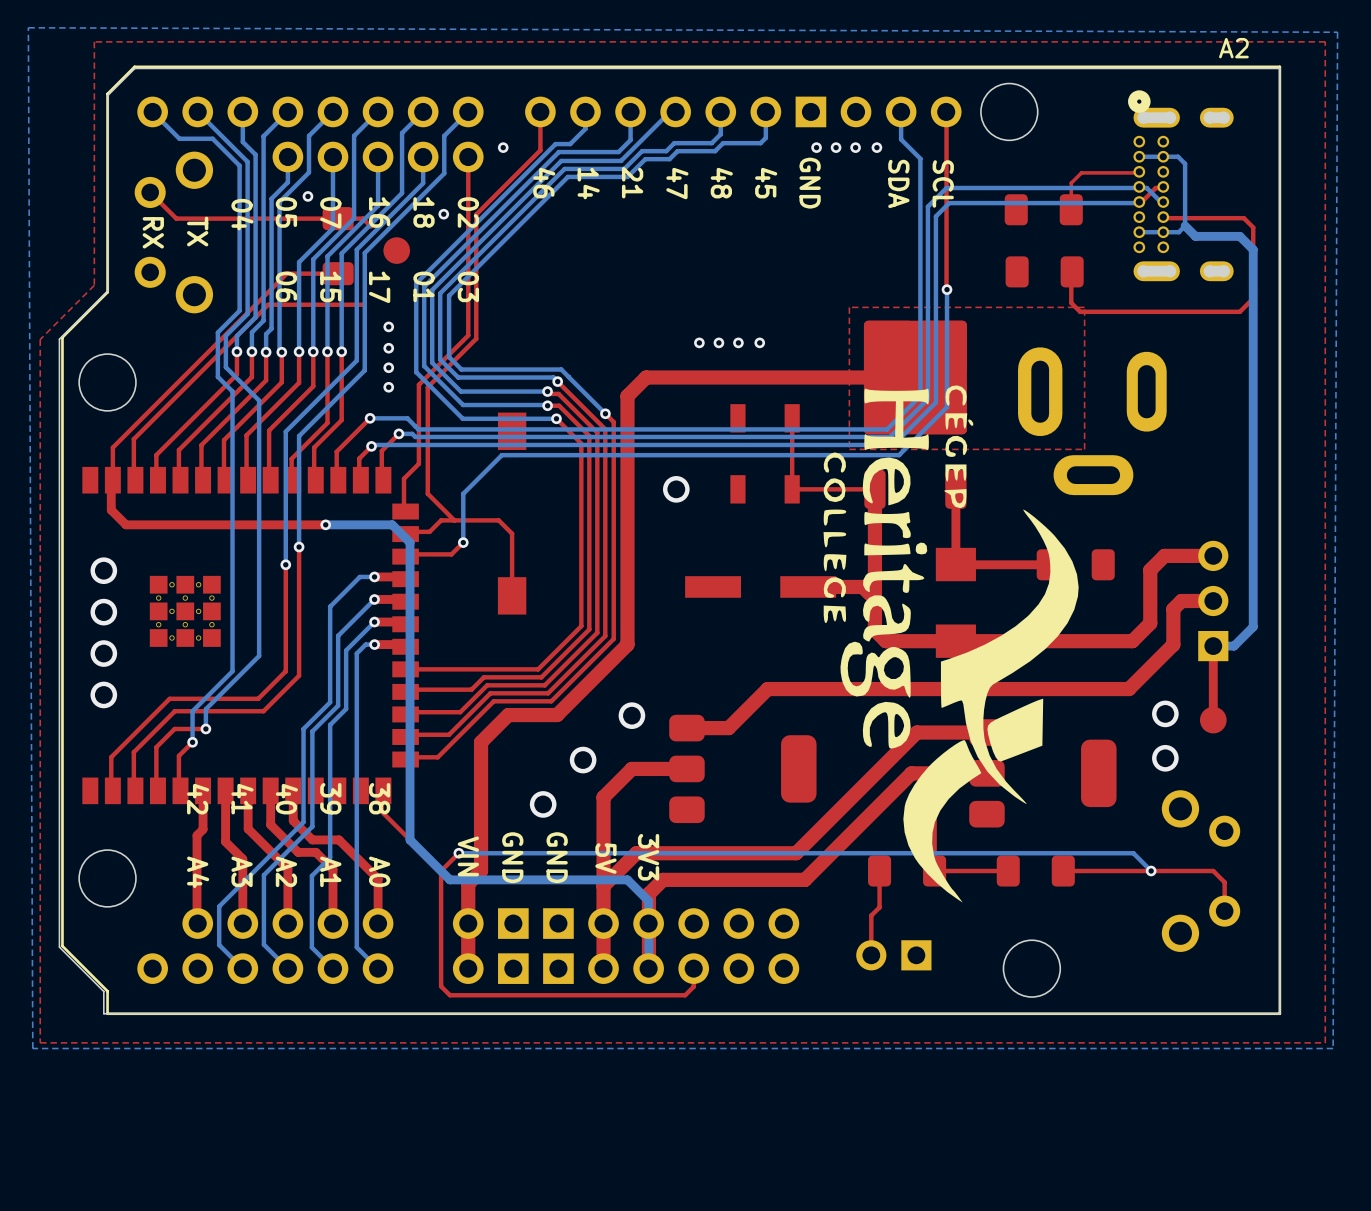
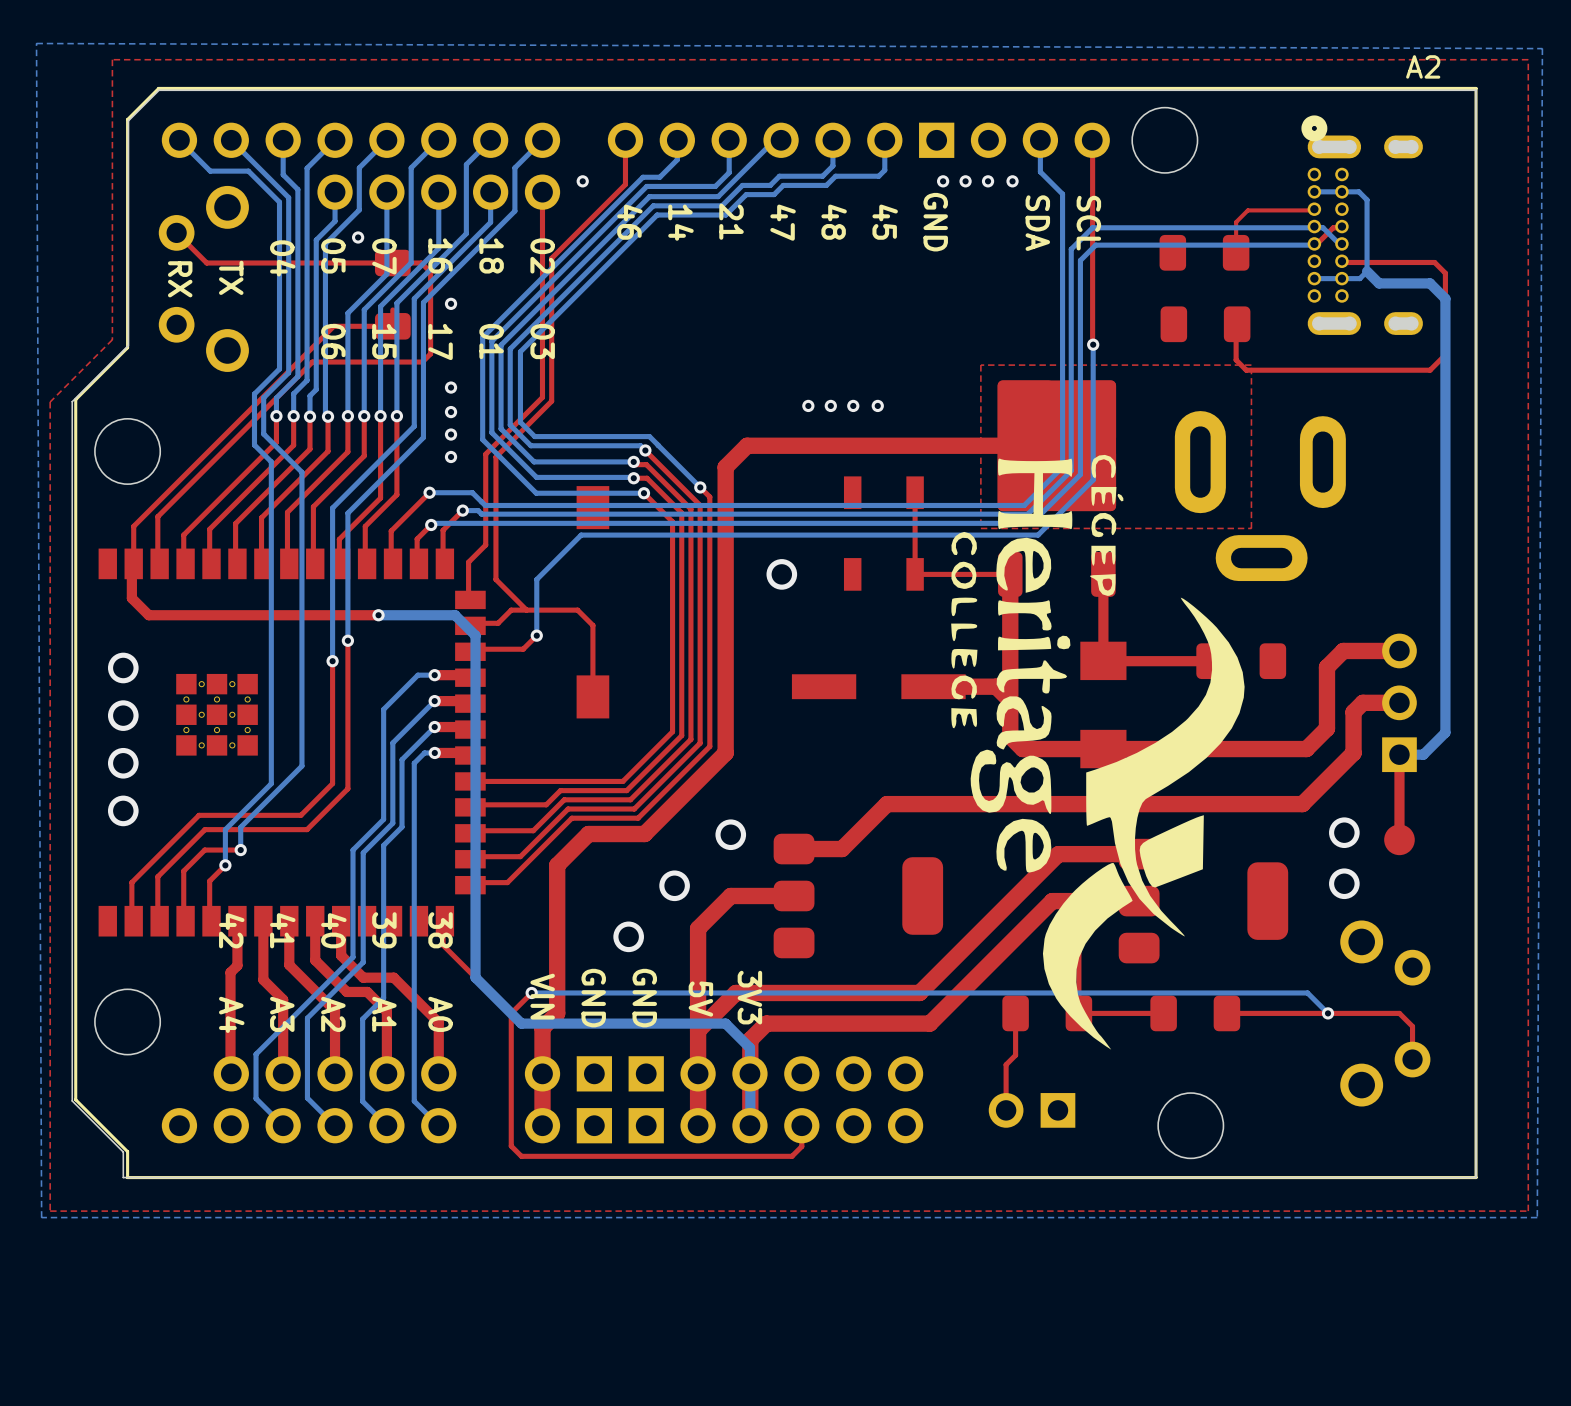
via position: (443, 214) -> (451, 303)
top track: none -> (430, 272) (430, 353) (422, 362)
part: (396, 250) -> none
top track: none -> (392, 309) (392, 316)

